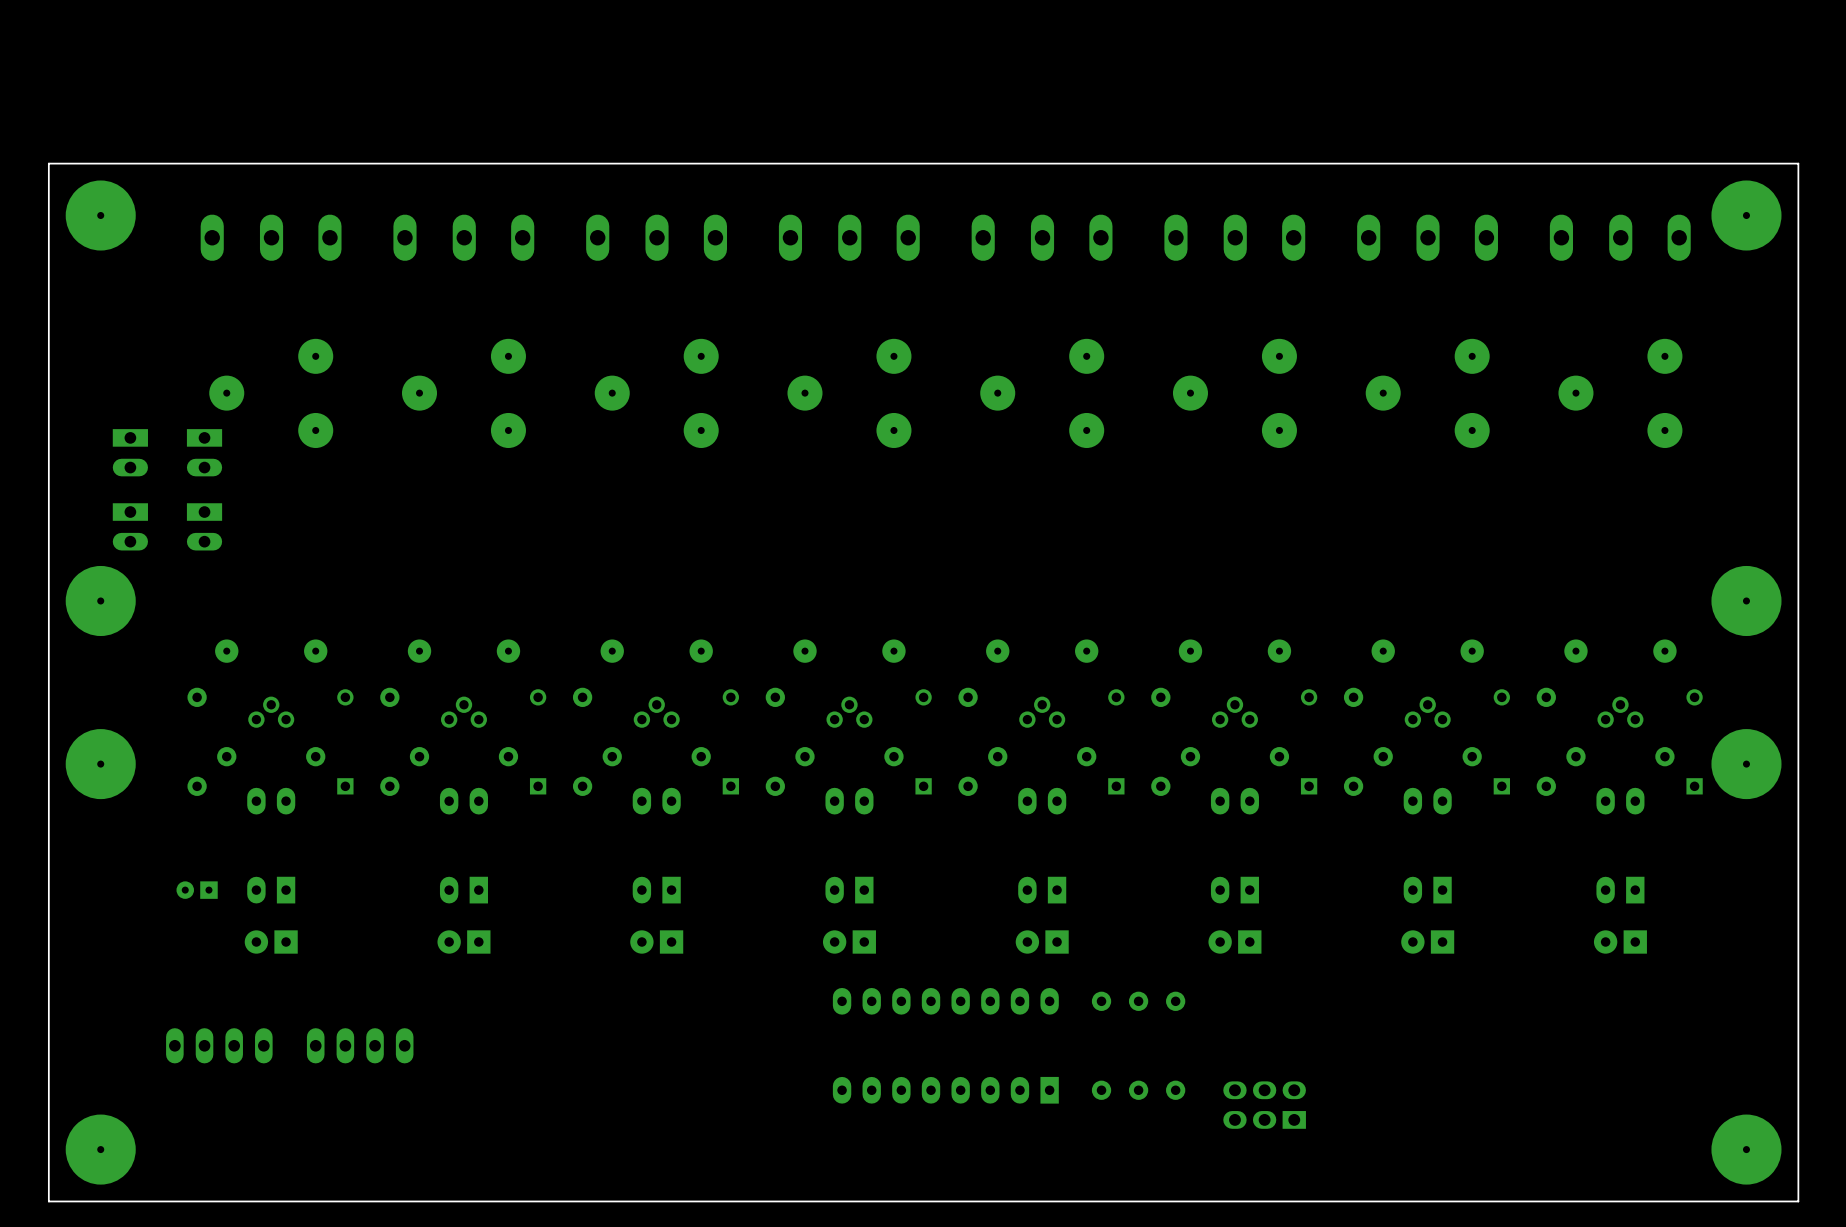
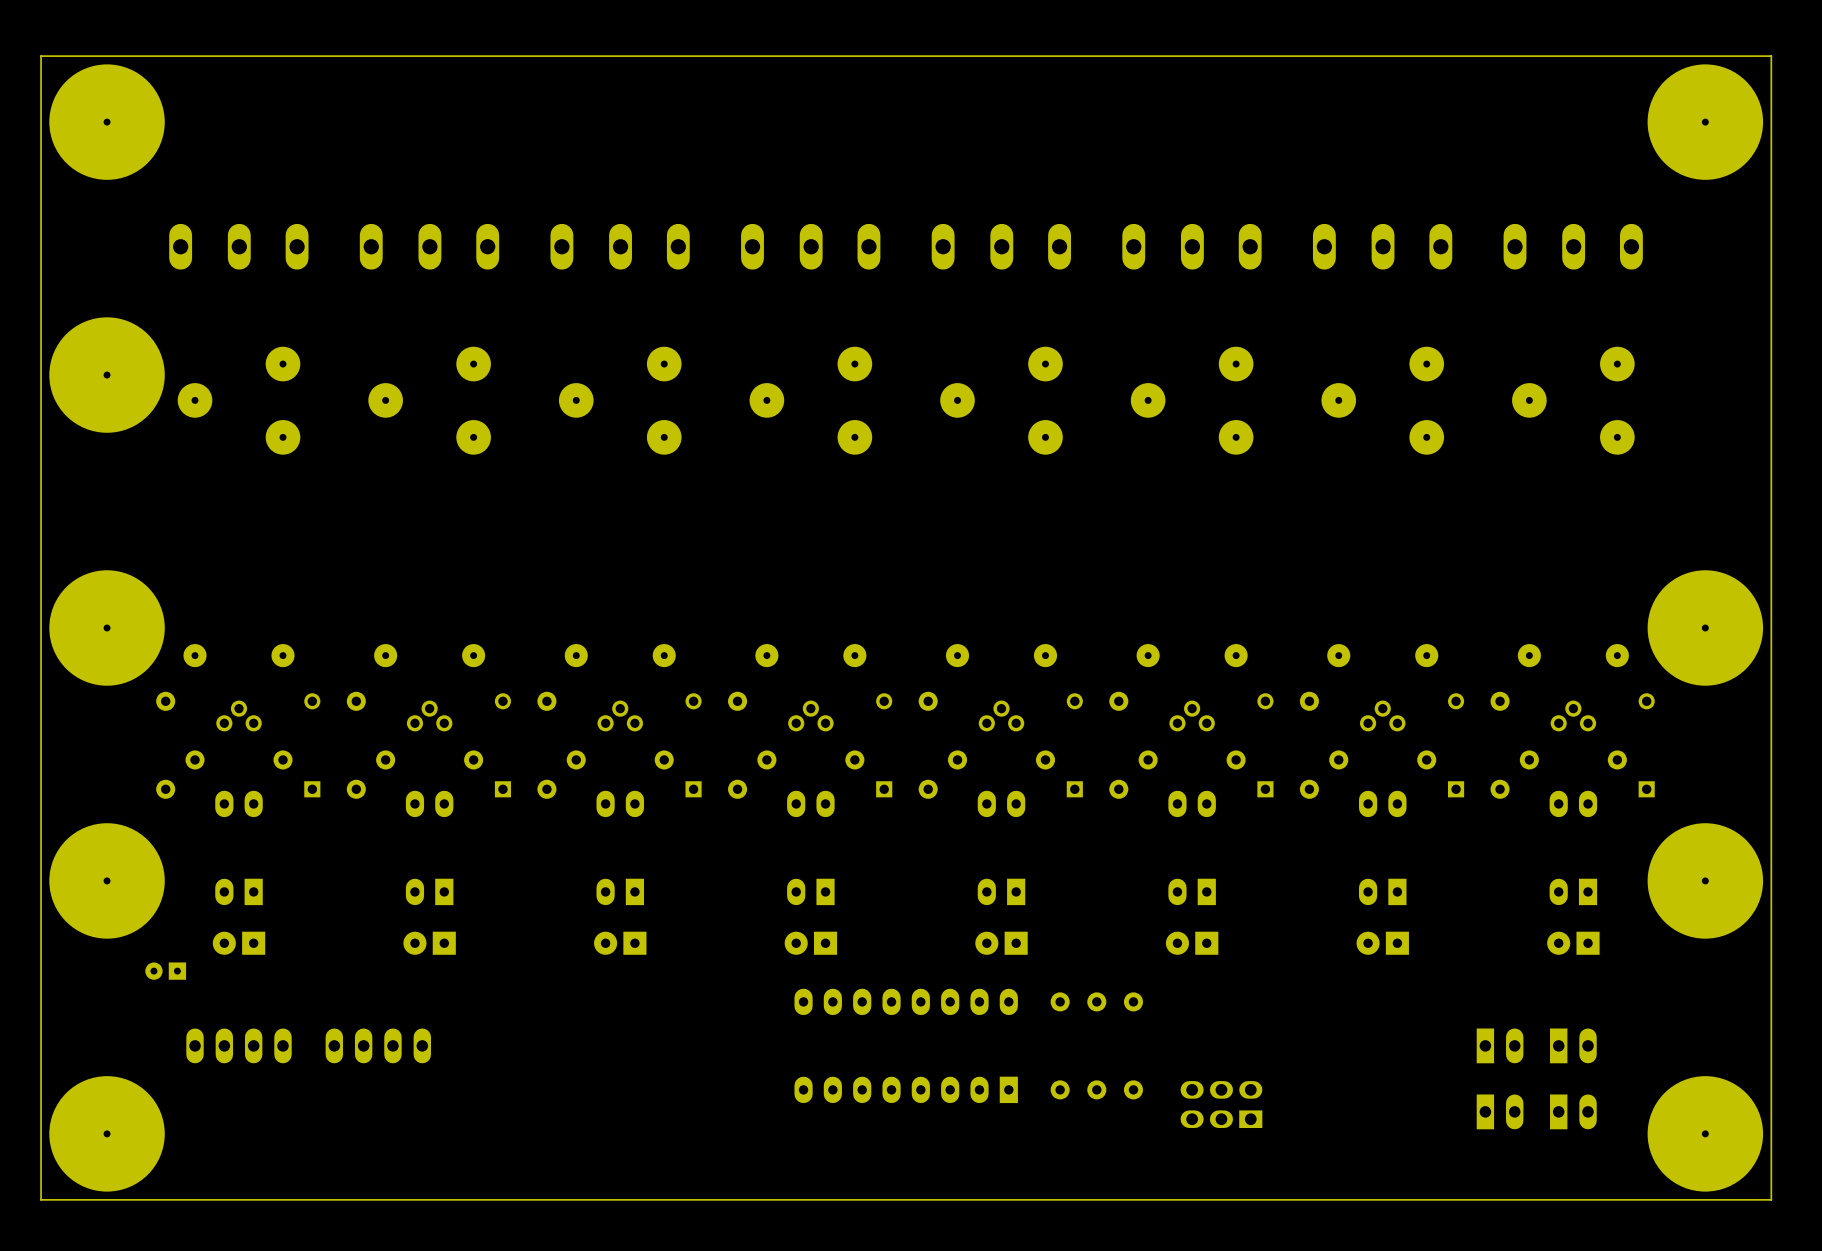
part: none -> (107, 122)
part: none -> (1705, 122)
part: (100, 215) -> none
part: (1746, 215) -> none
part: none -> (107, 375)
part: (130, 452) -> none
part: (204, 452) -> none
part: (130, 526) -> none
part: (204, 526) -> none
part: (100, 600) -> none
part: (1746, 600) -> none
part: none -> (107, 627)
part: none -> (1705, 627)
part: (100, 764) -> none
part: (1746, 764) -> none
part: none -> (107, 880)
part: none -> (1705, 880)
part position: (197, 890) -> (165, 971)
part: (219, 1045) -> none
part: none -> (239, 1045)
part: (360, 1045) -> none
part: none -> (378, 1045)
part: none -> (1500, 1045)
part: none -> (1573, 1045)
part: none -> (1500, 1111)
part: none -> (1573, 1111)
part: none -> (107, 1133)
part: none -> (1705, 1133)
part: (100, 1149) -> none
part: (1746, 1149) -> none
board edge: (1798, 1201) (1798, 163) (48, 163) (48, 1201) (71, 1201) -> (1749, 1199) (1771, 1199) (1771, 56) (41, 56) (41, 1199)

